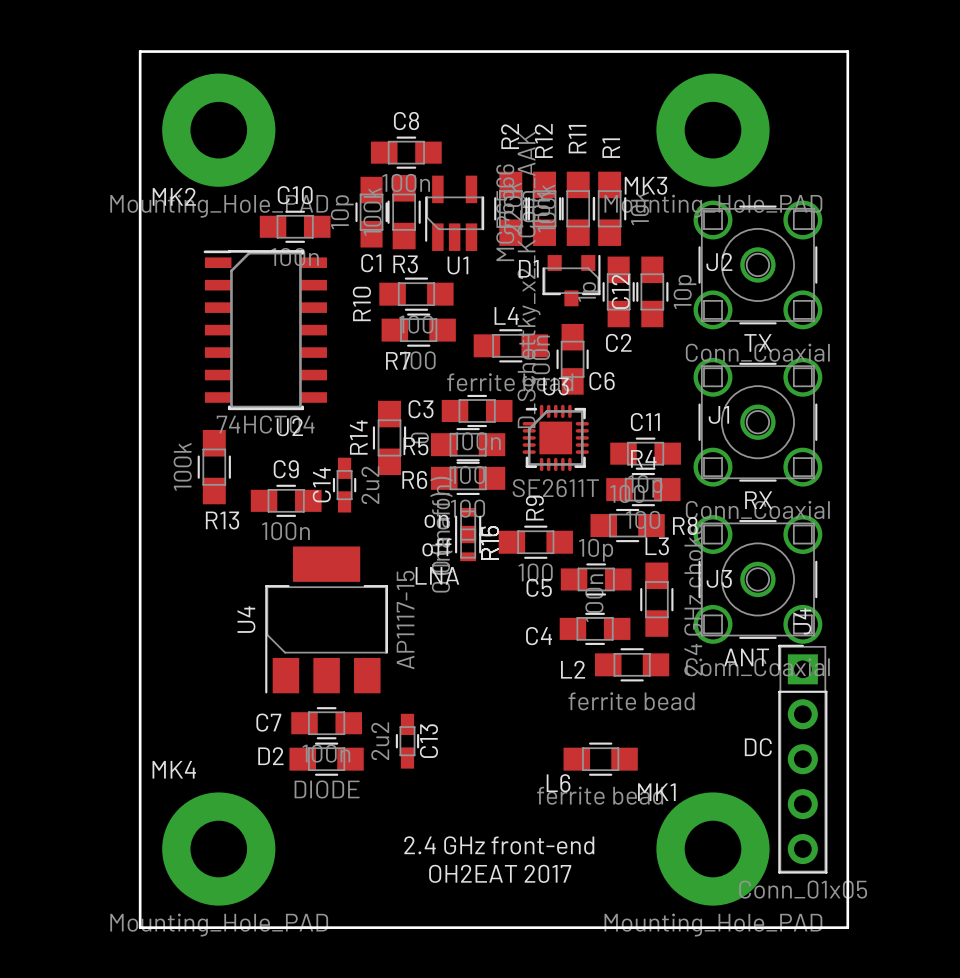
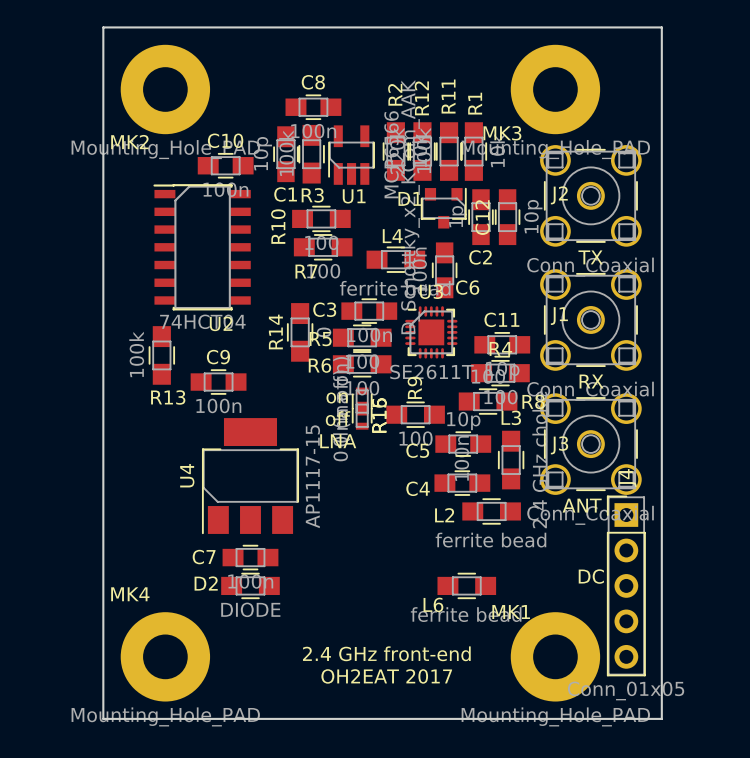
C14: 2u2 (344, 485) -> none
C13: 2u2 (407, 741) -> none

